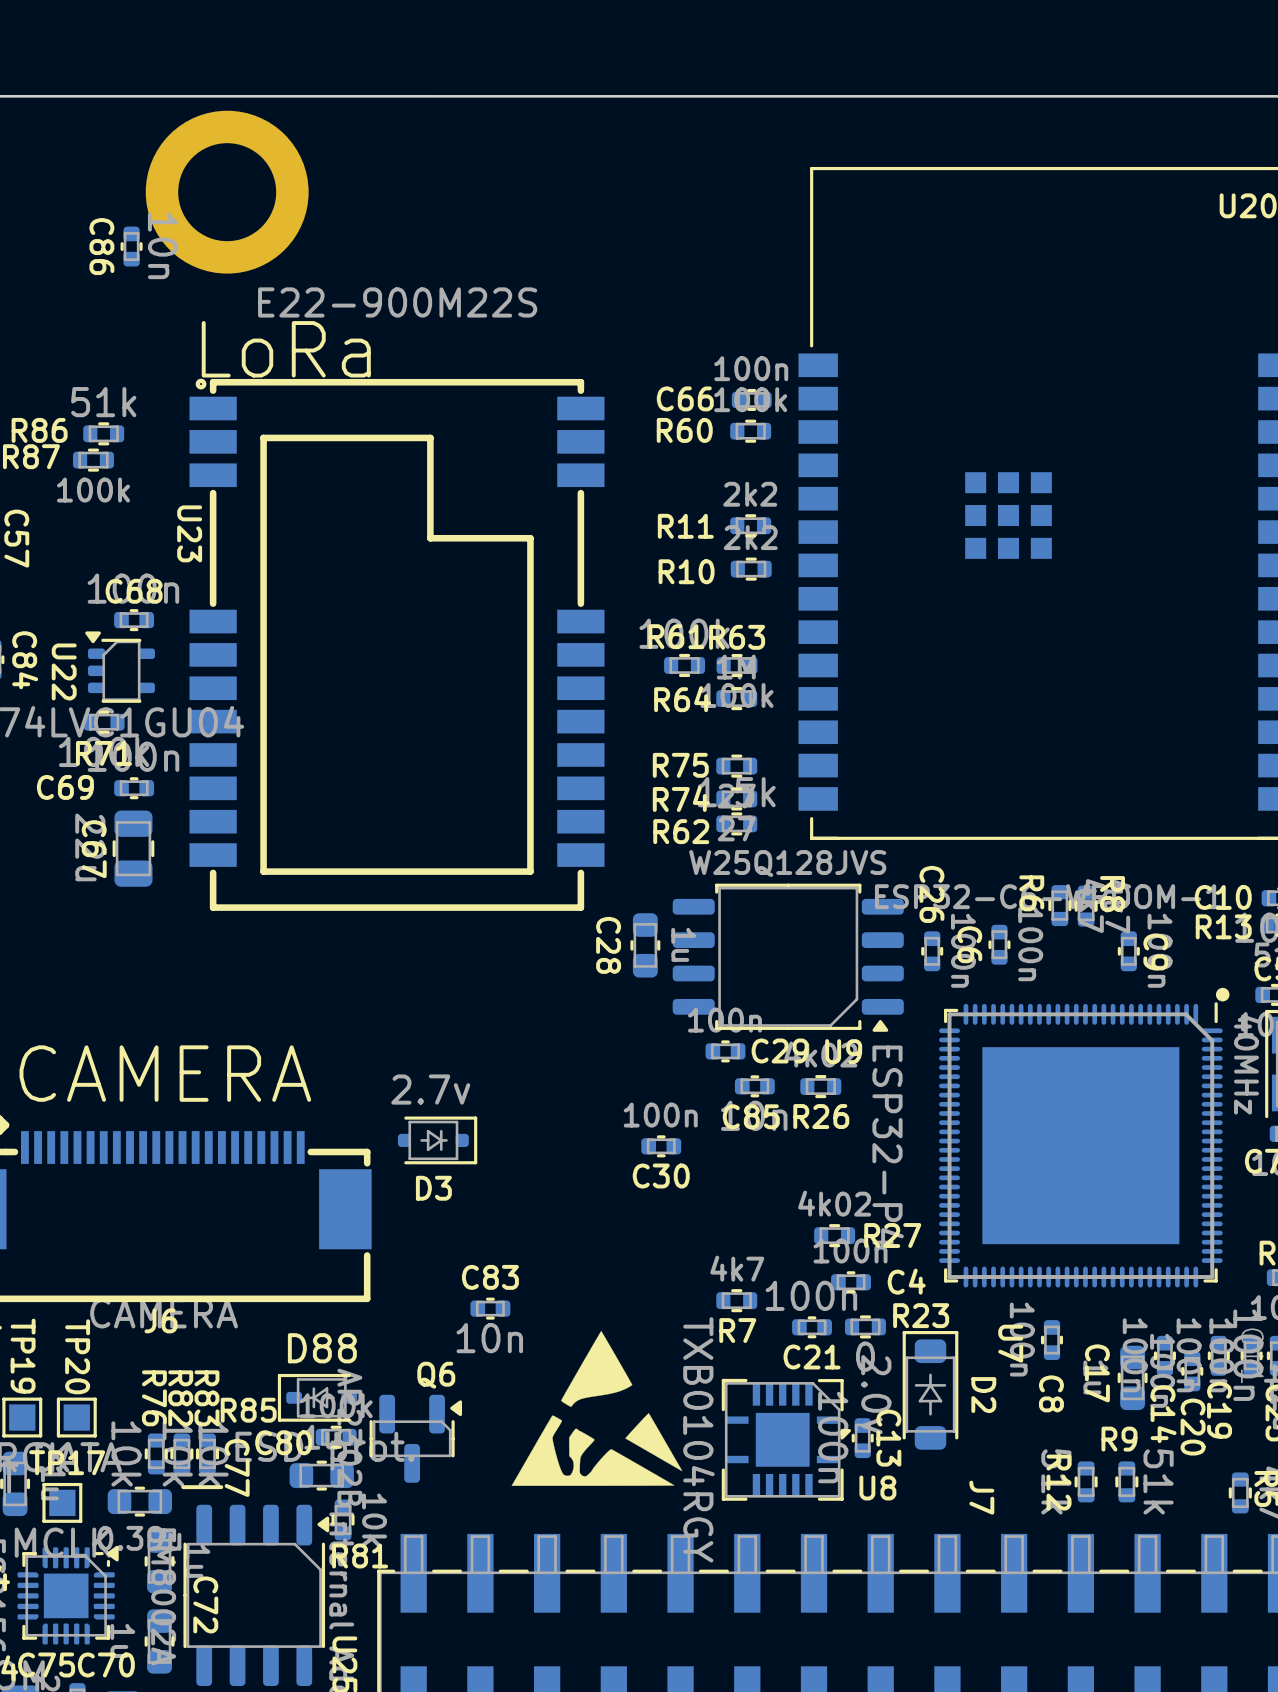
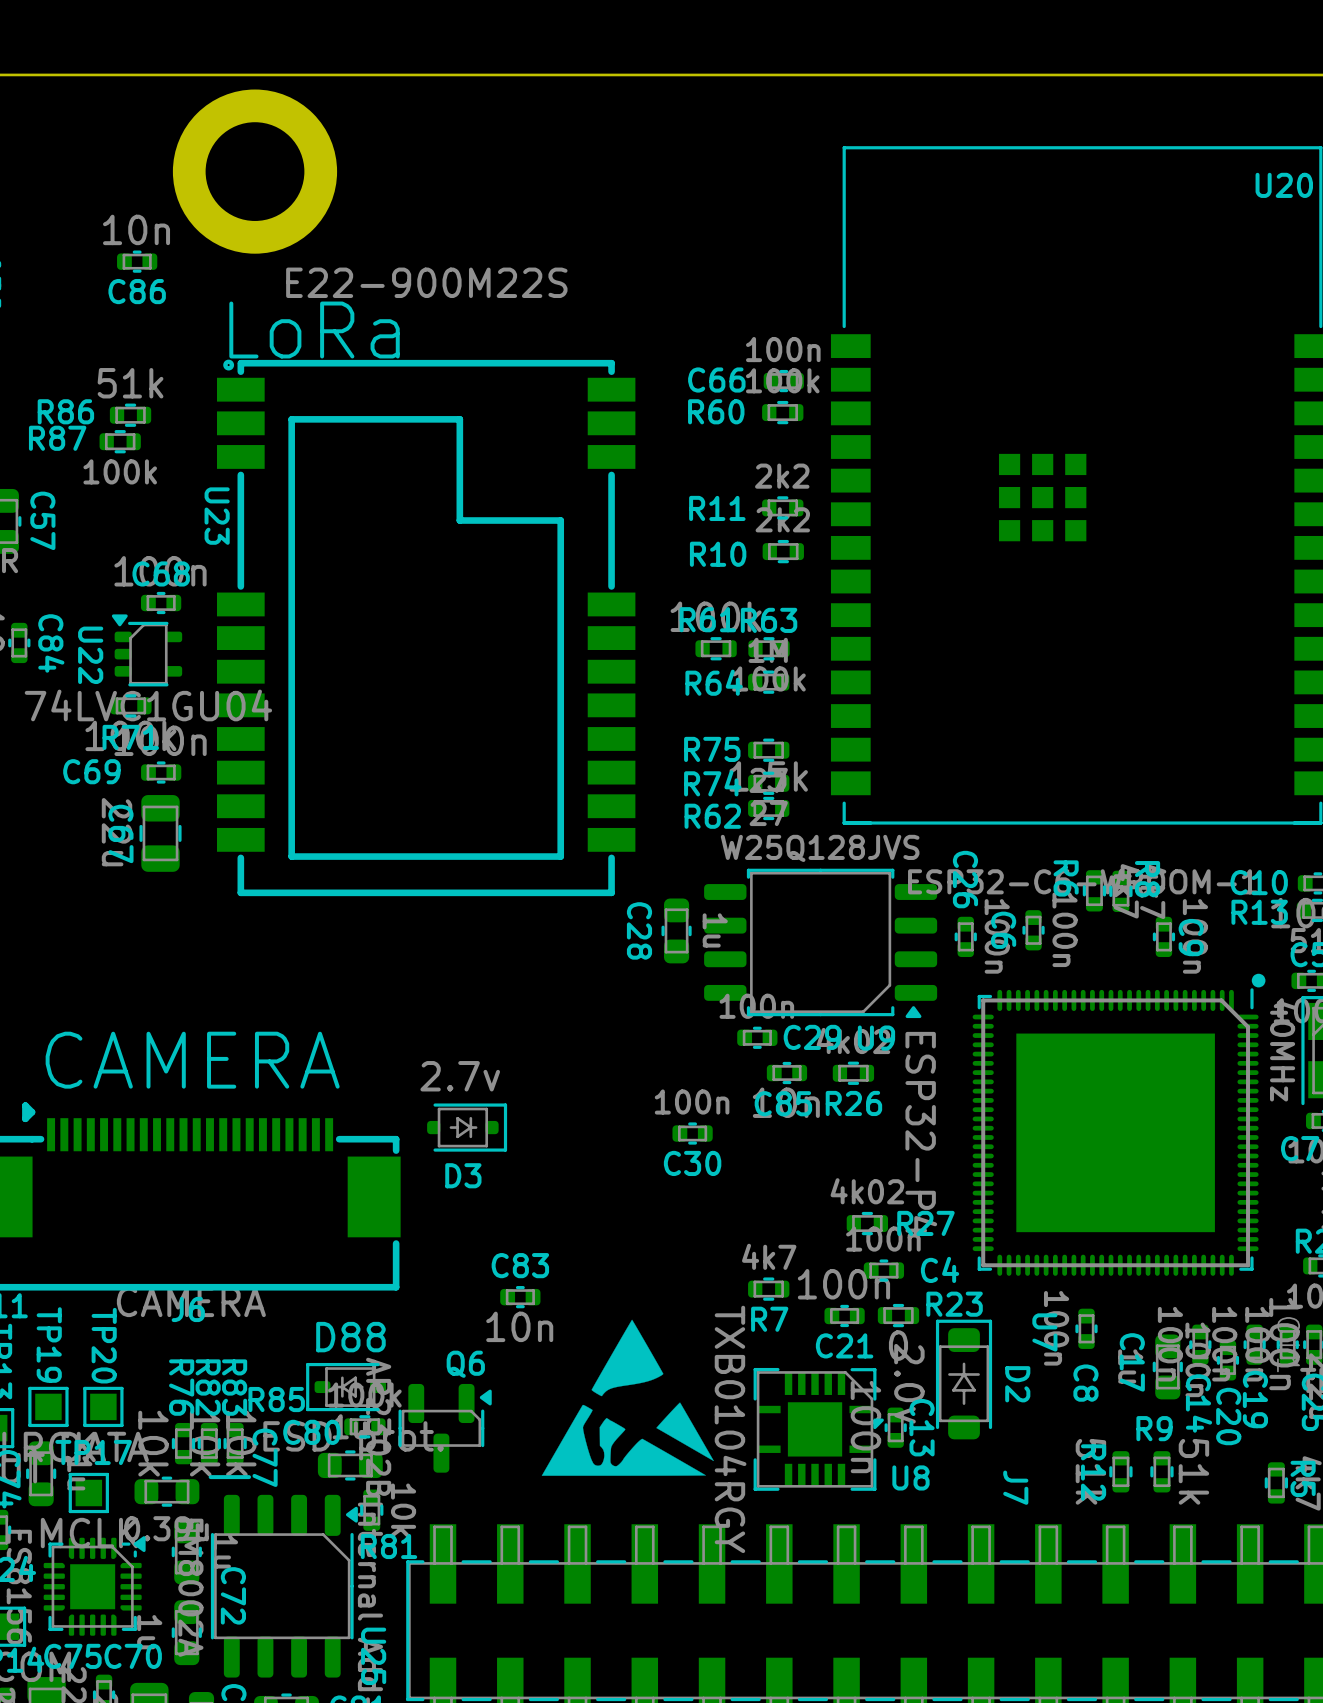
C86 rotation: 0° (131, 246) -> 90° clockwise (137, 261)
C86 position: (131, 246) -> (137, 261)

